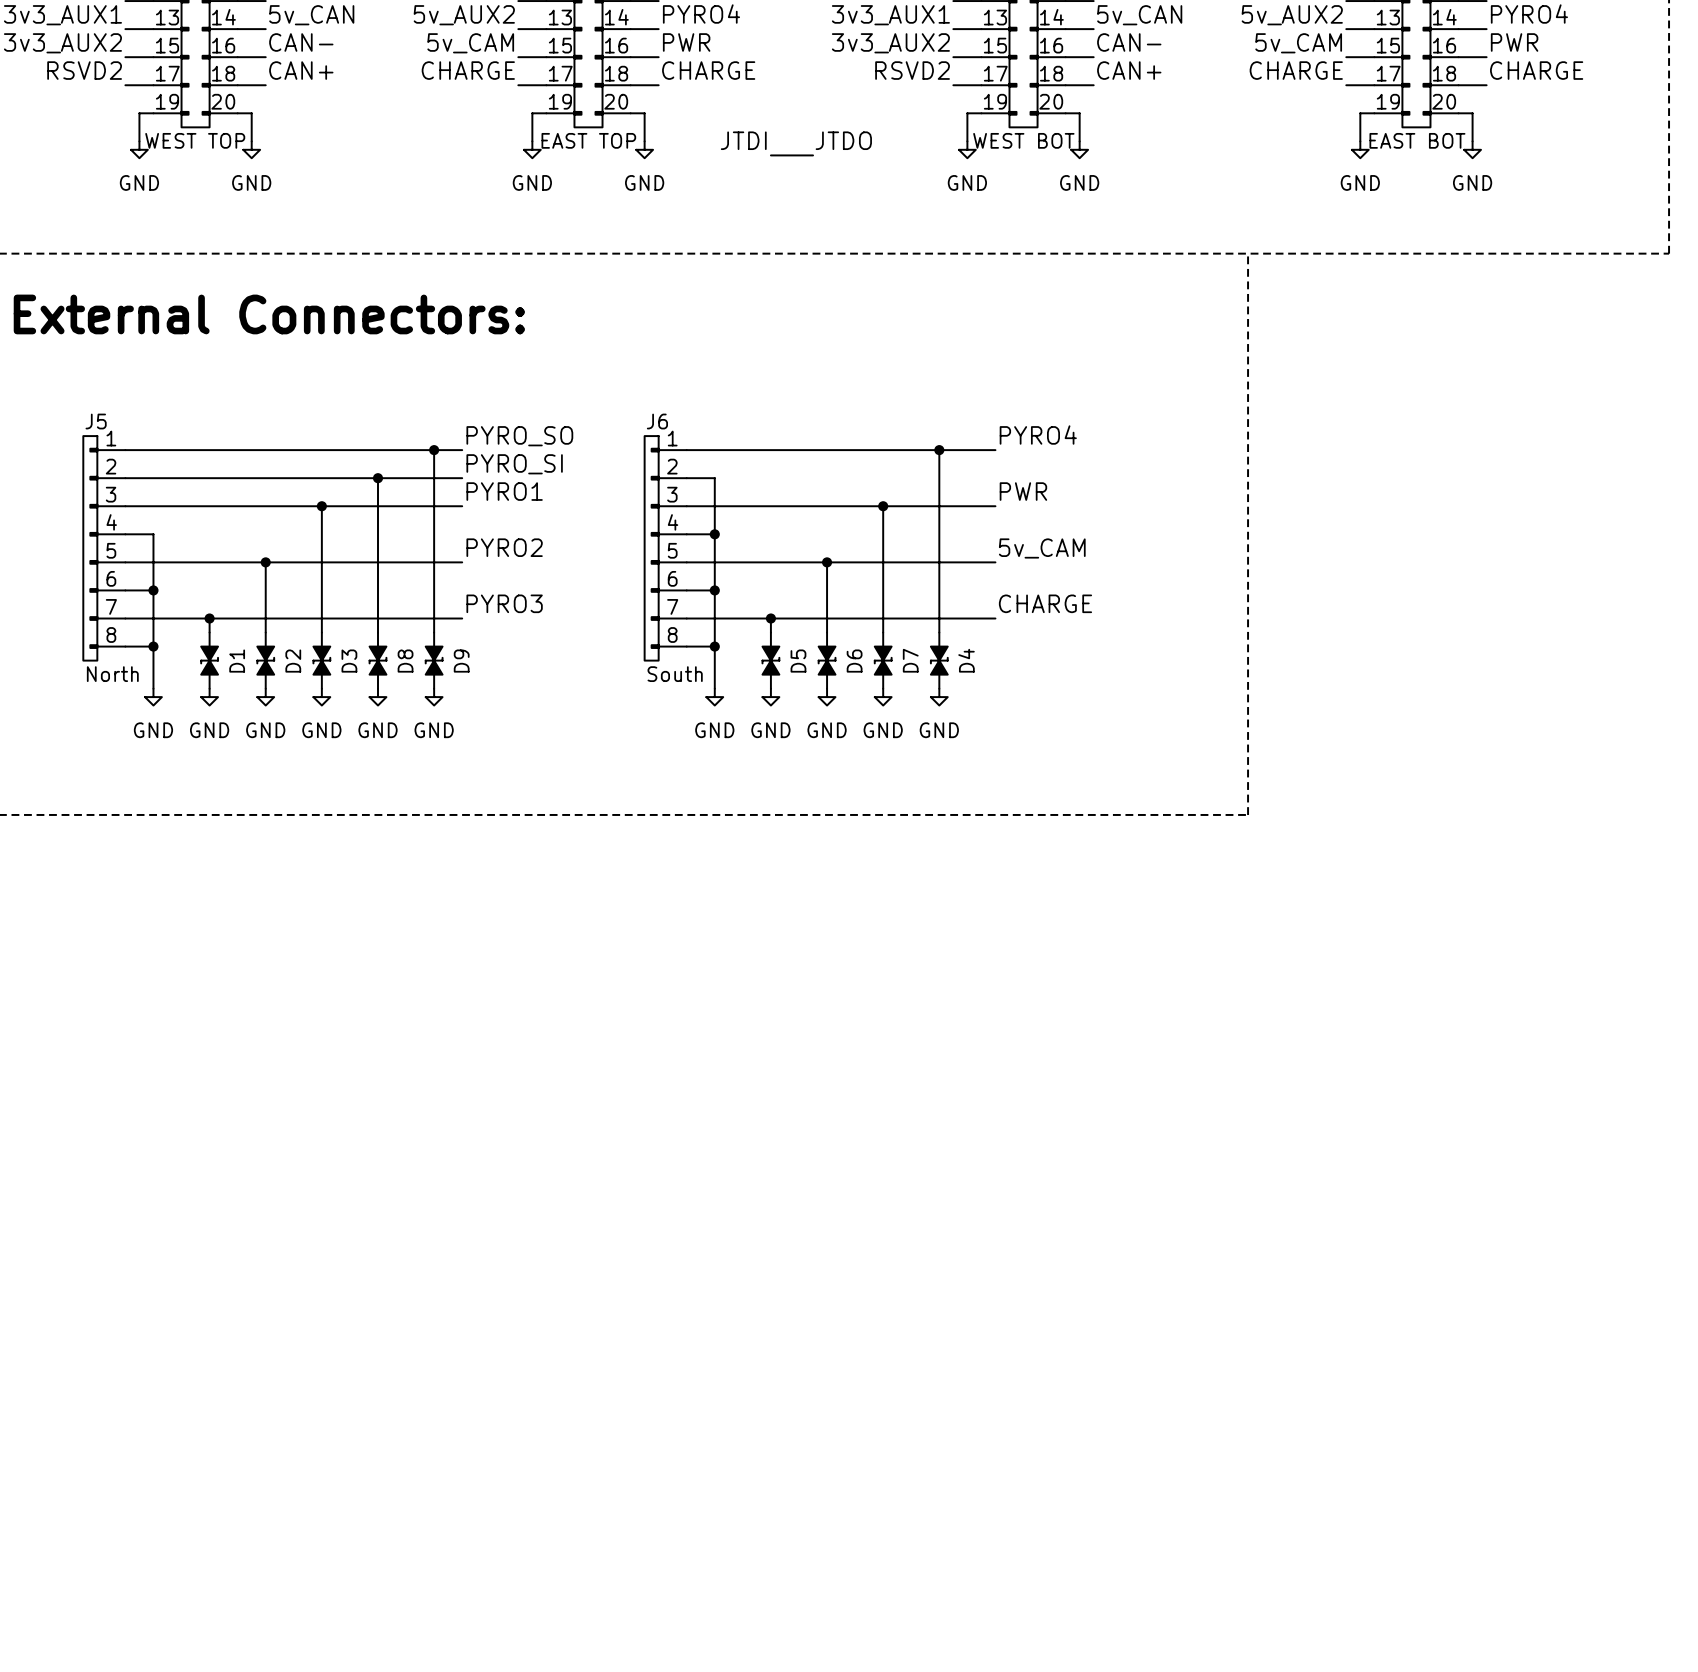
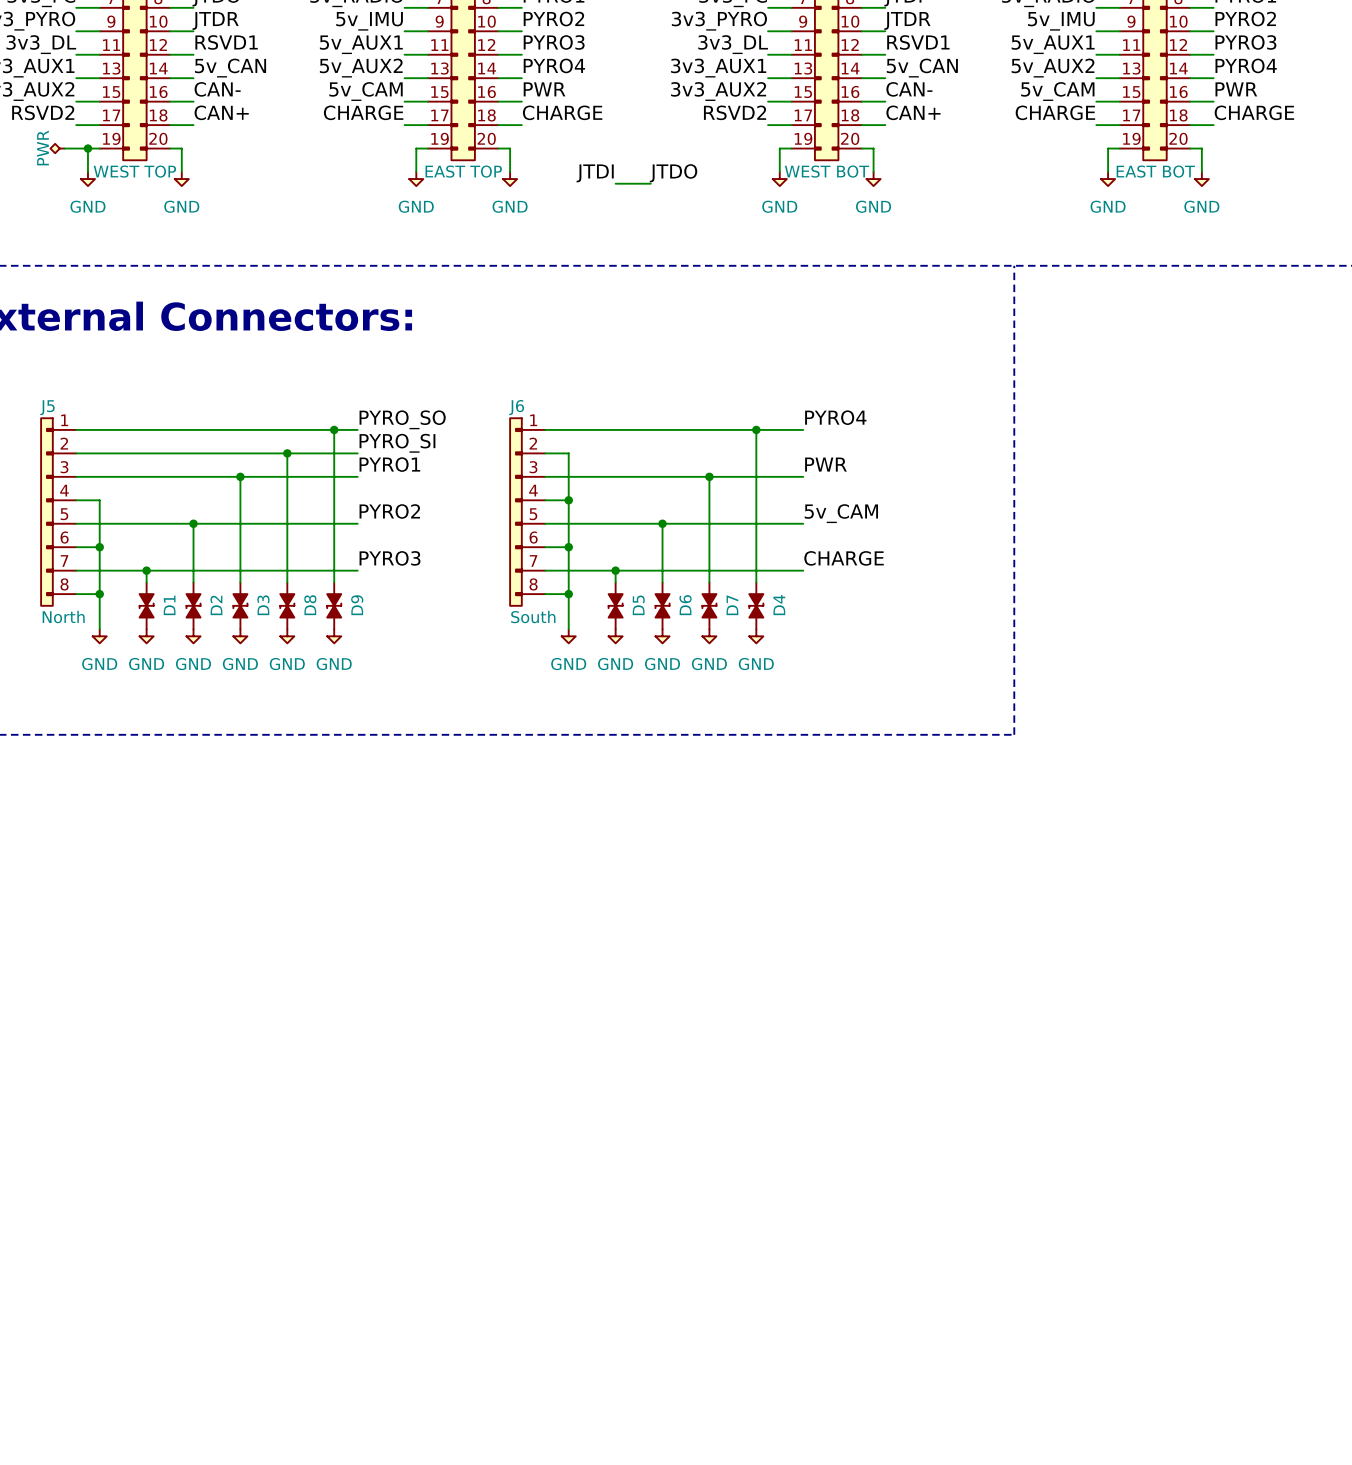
power symbol: none -> PWR (57, 148)
wire: none -> (64, 148) (87, 148)
junction: none -> (87, 148)

